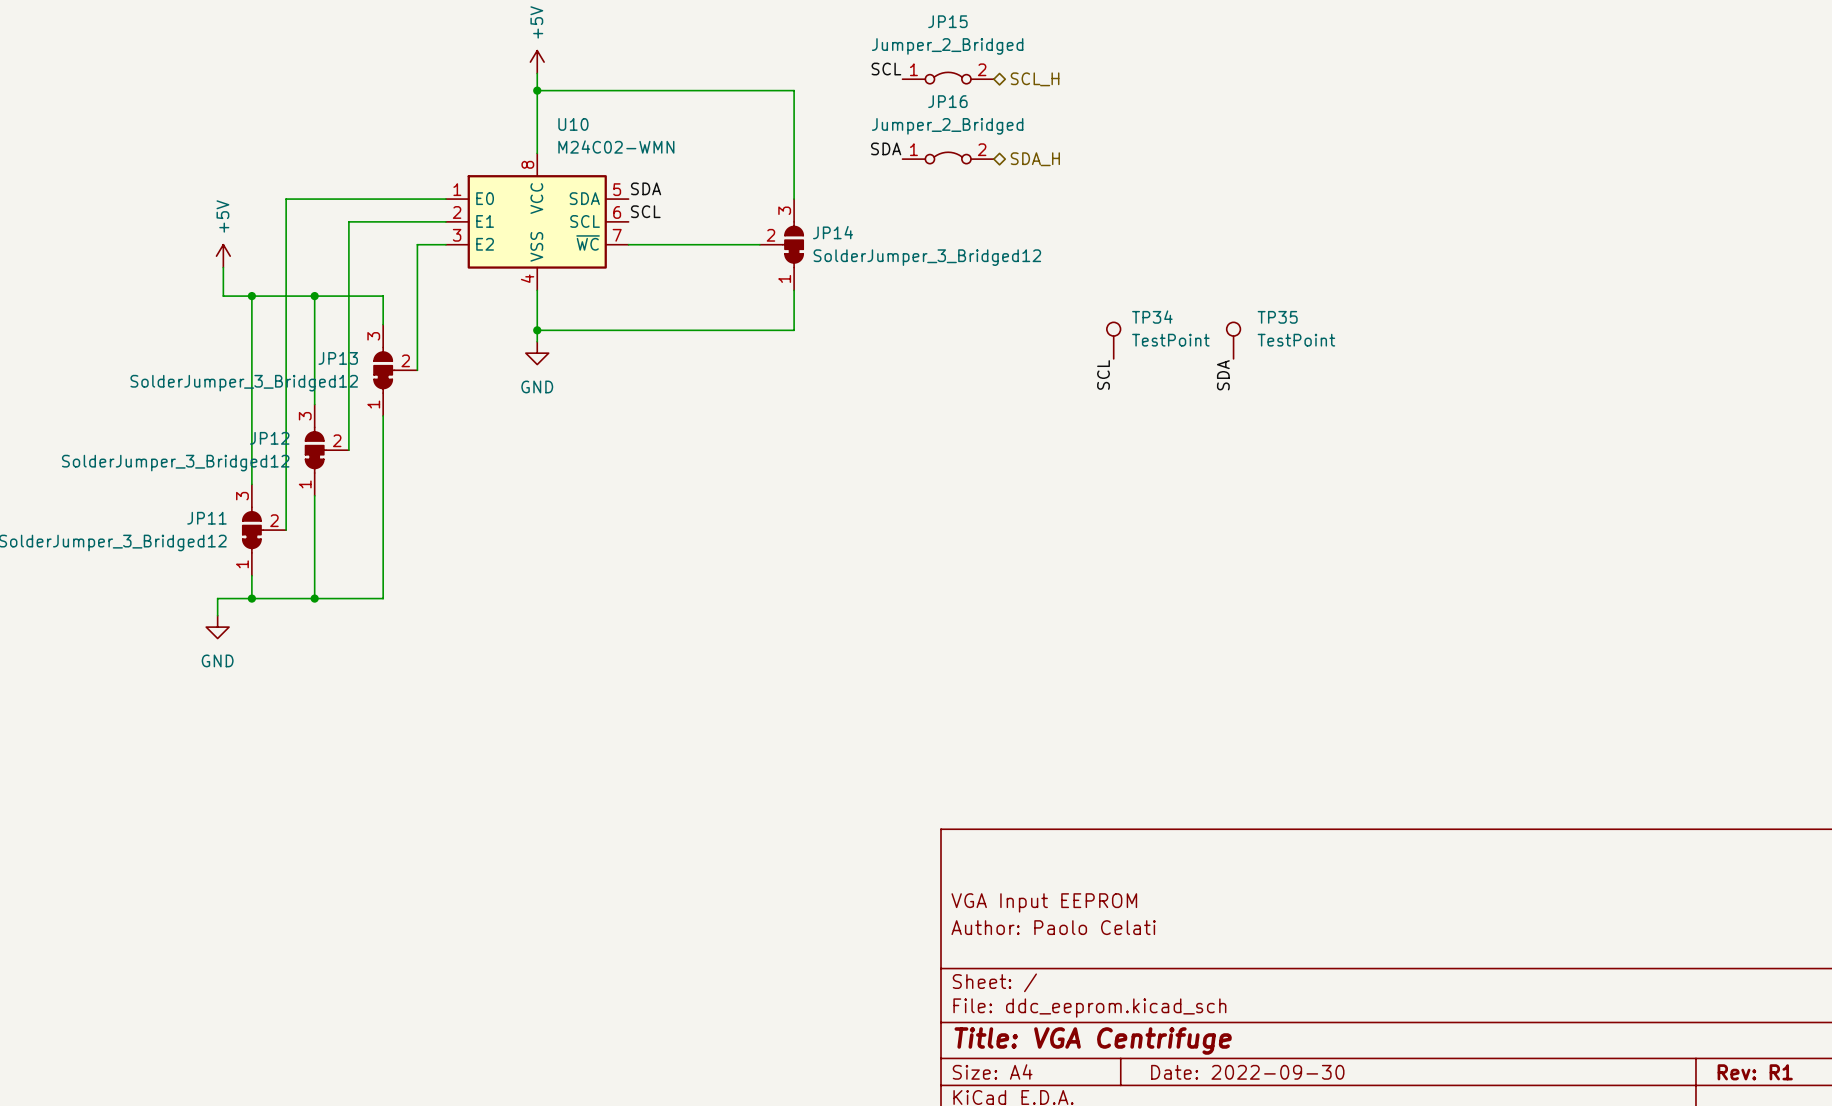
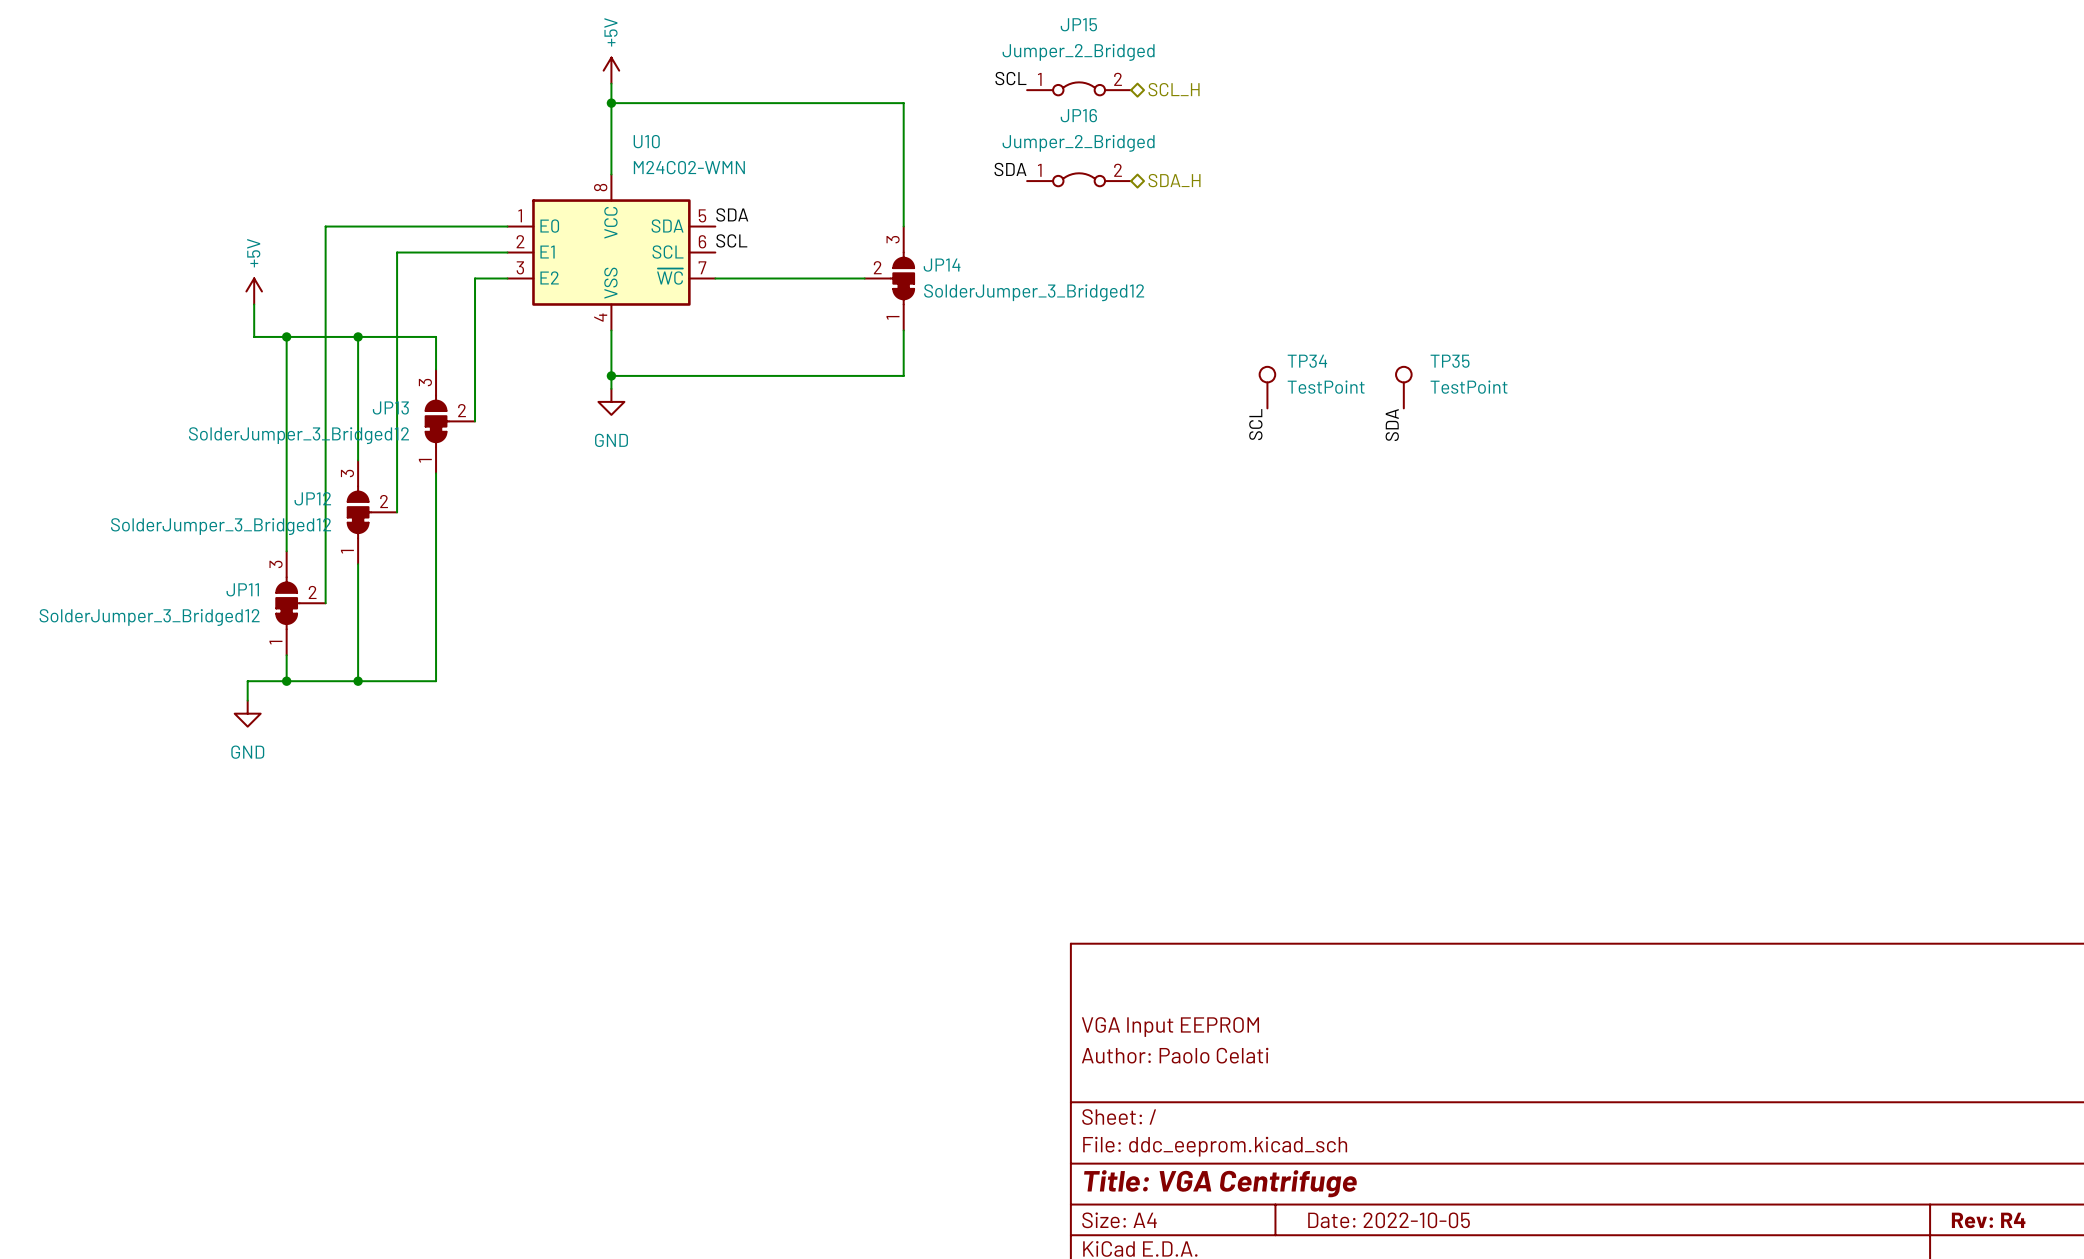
title block: Date: 2022-09-30 (1247, 1072) -> Date: 2022-10-05 (1389, 1220)
title block: Rev: R1 (1755, 1072) -> Rev: R4 (1988, 1220)

